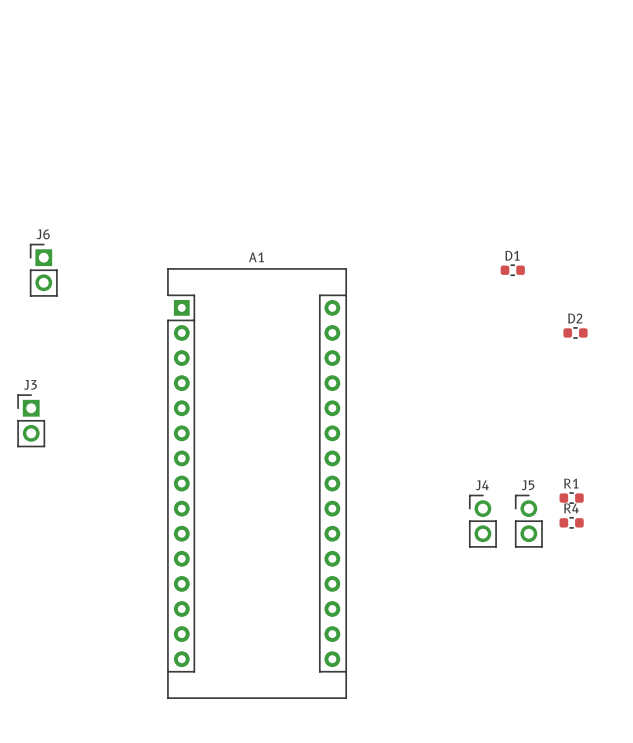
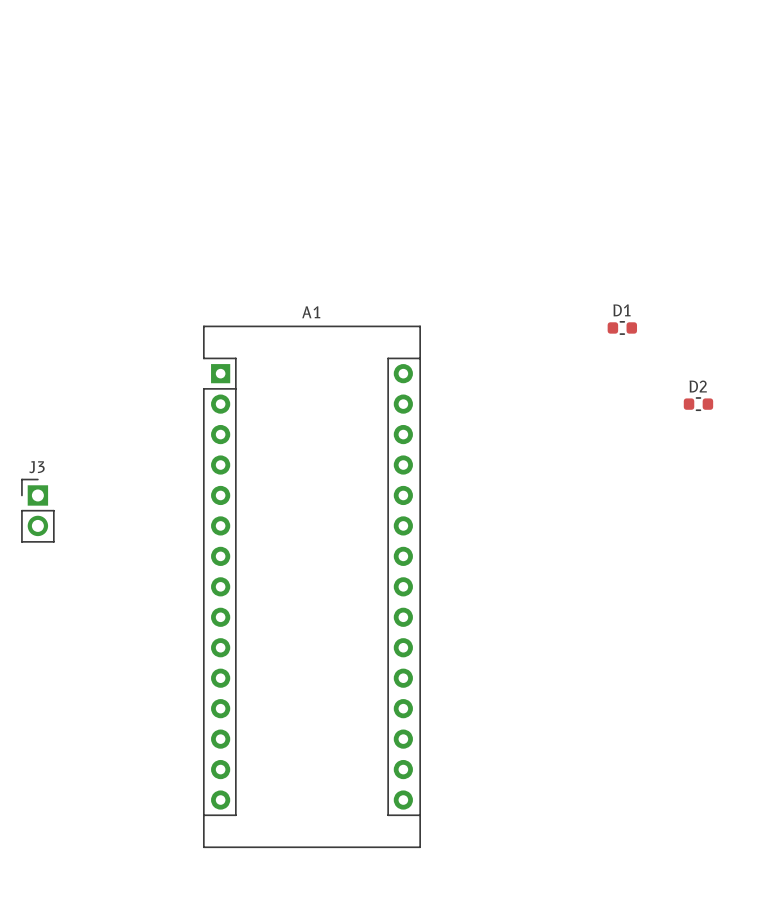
J6: (43, 270) -> none
R1: (571, 498) -> none
J4: (482, 521) -> none
J5: (528, 521) -> none
R4: (571, 522) -> none

